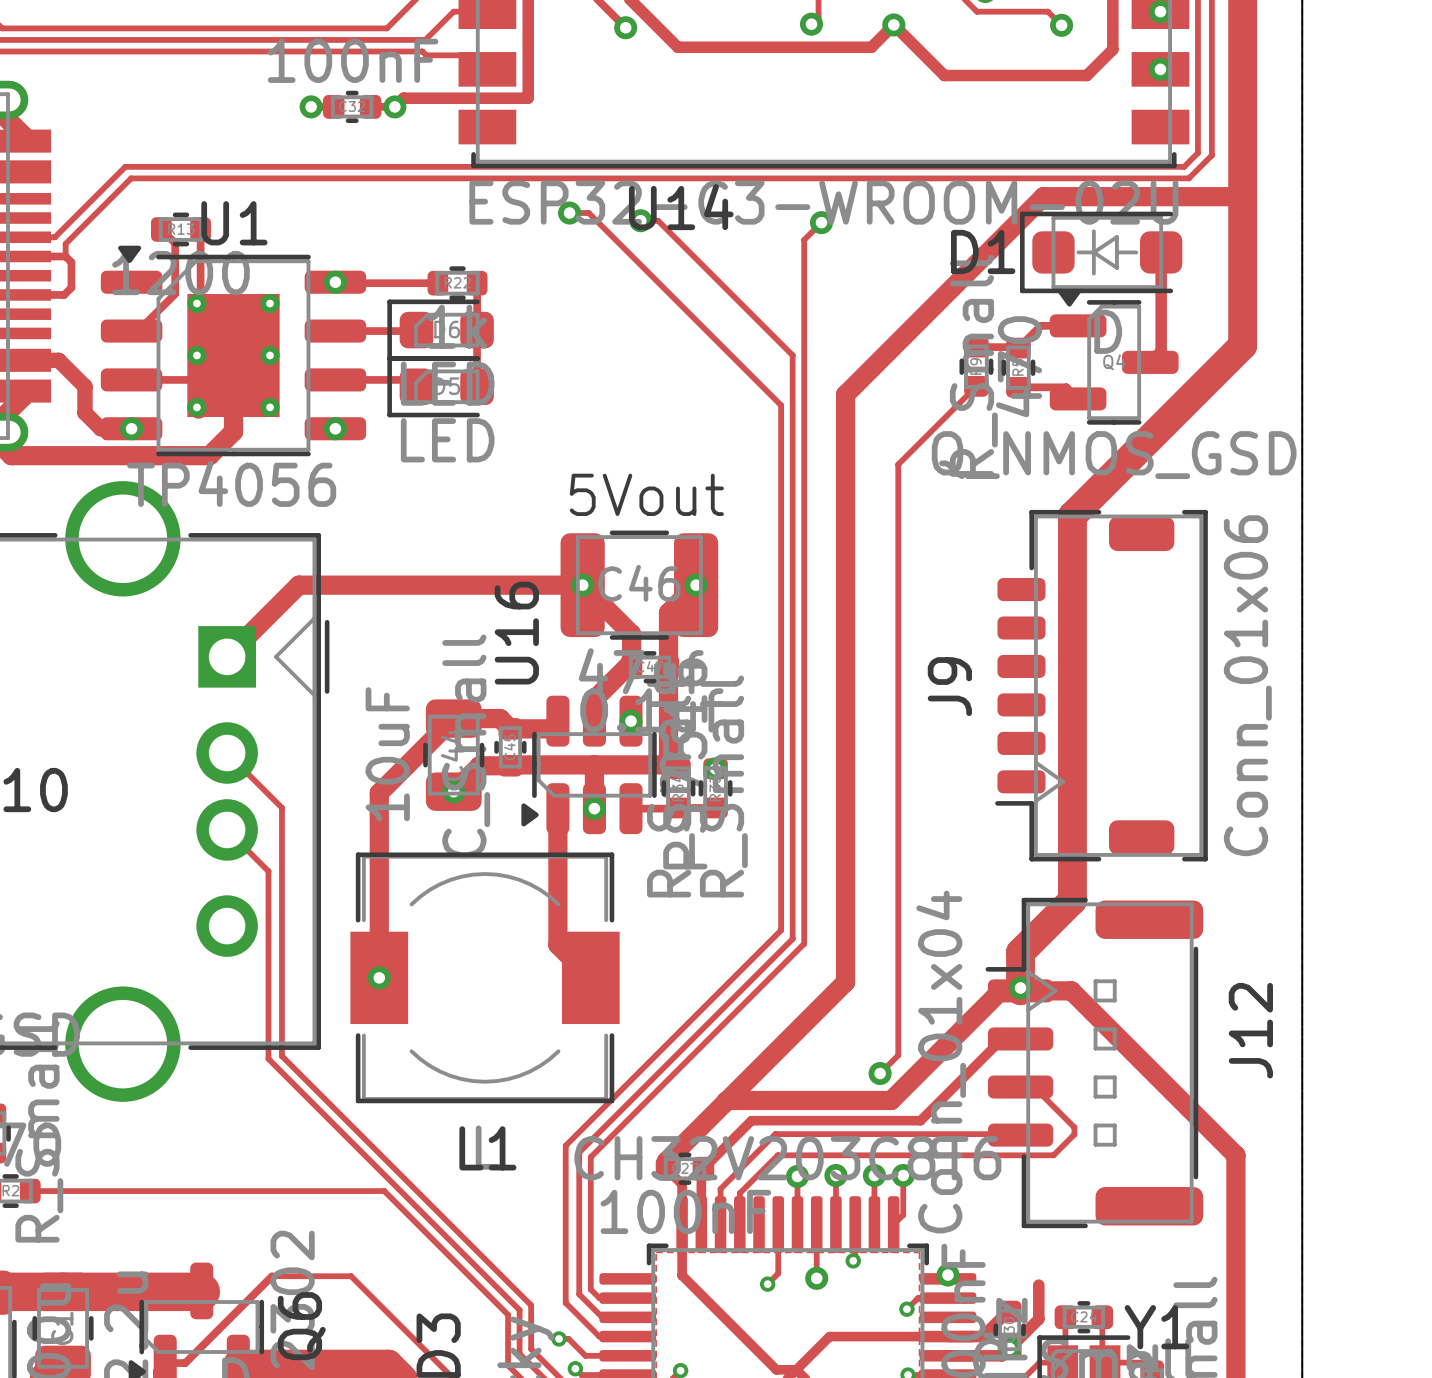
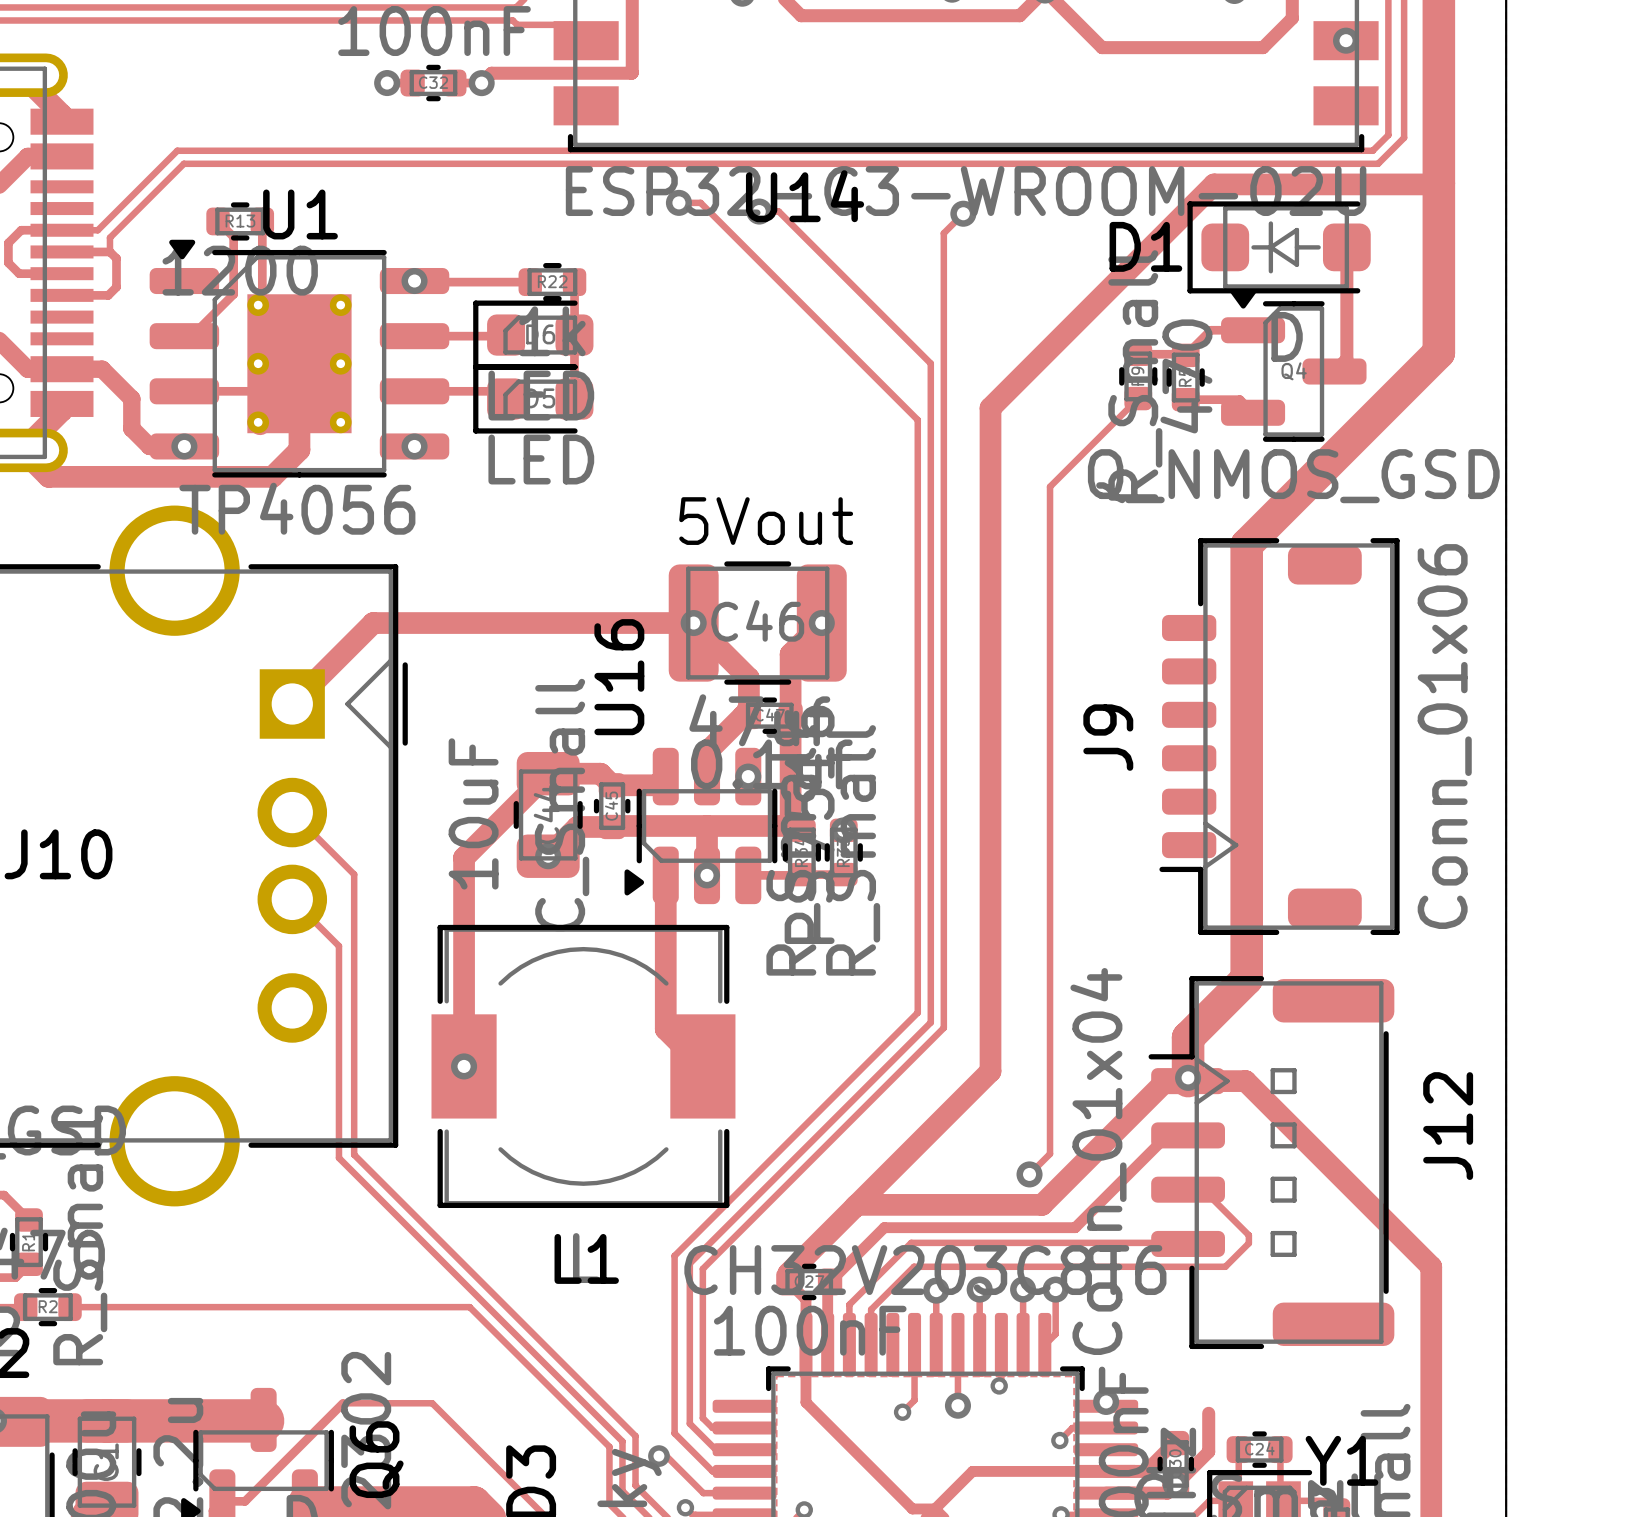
track: (559, 1338) (568, 1338) (585, 1355) (591, 1355) -> (658, 1456) (666, 1456) (703, 1493)
via position: (559, 1338) -> (658, 1456)

